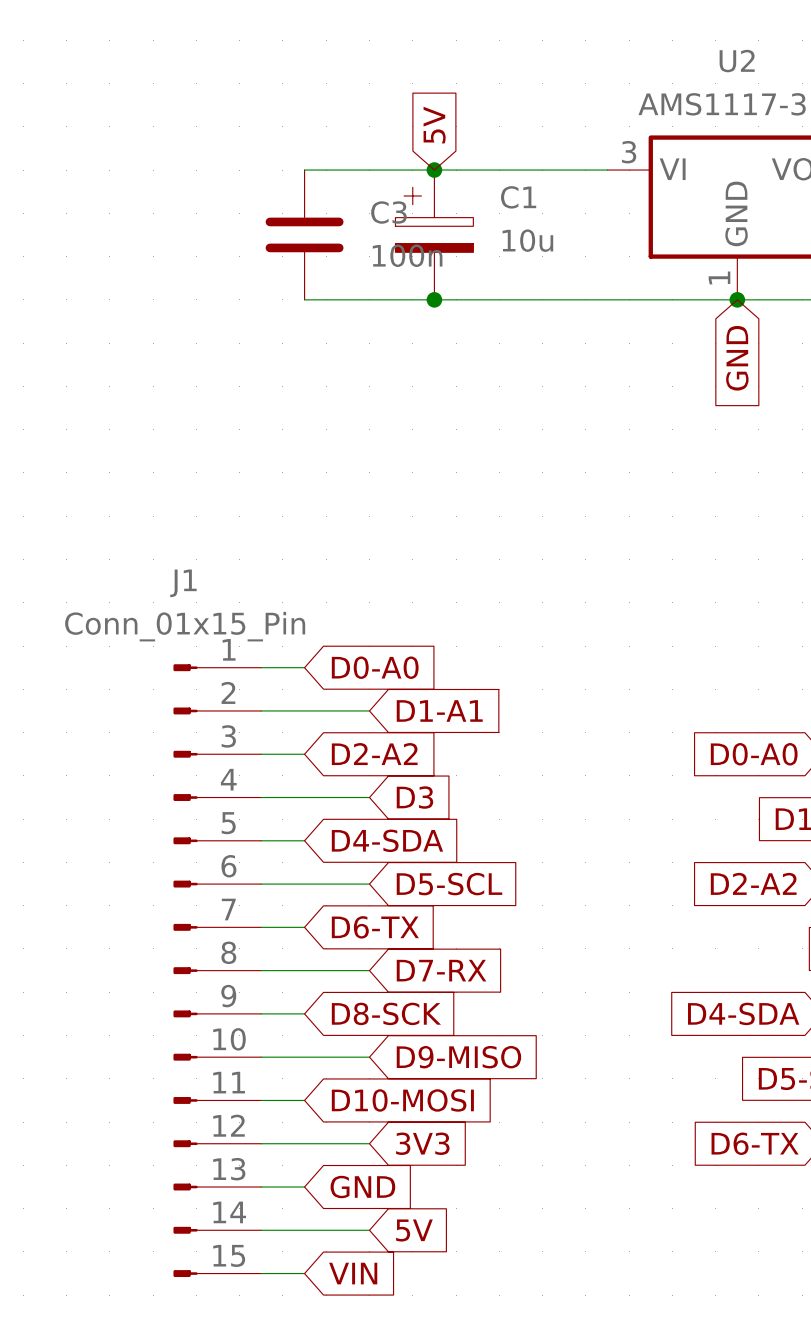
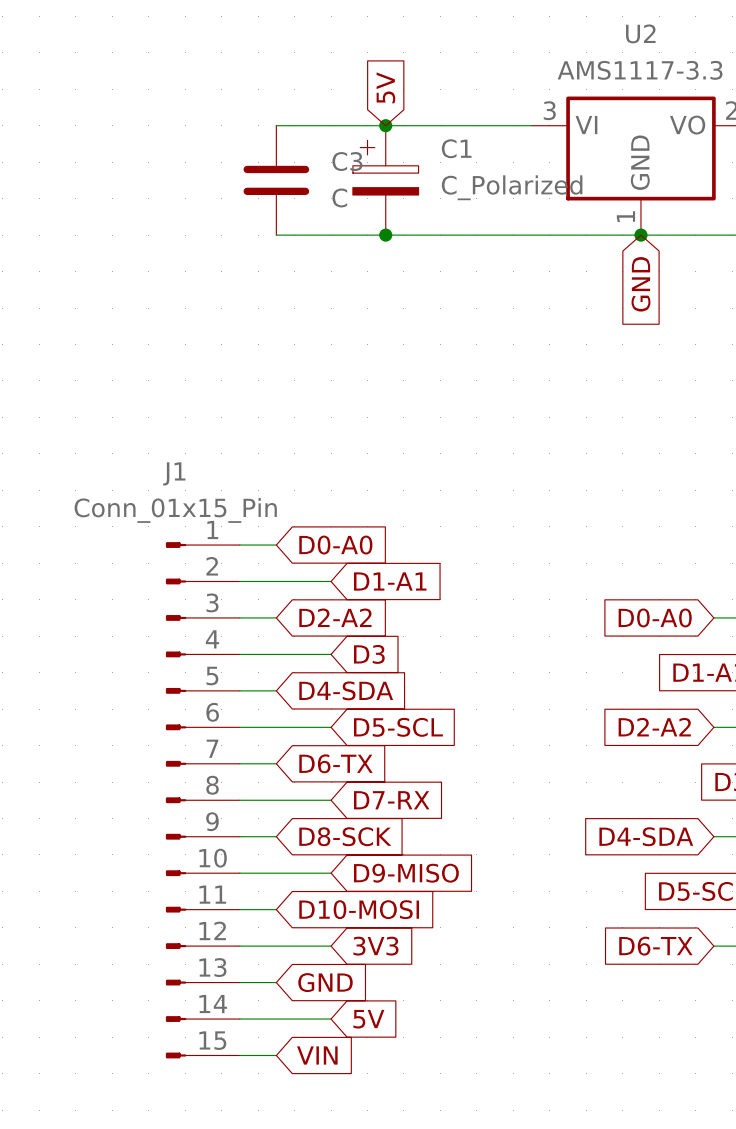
C1 value: 10u (527, 240) -> C_Polarized (512, 187)
C3 value: 100n (407, 255) -> C (339, 197)

